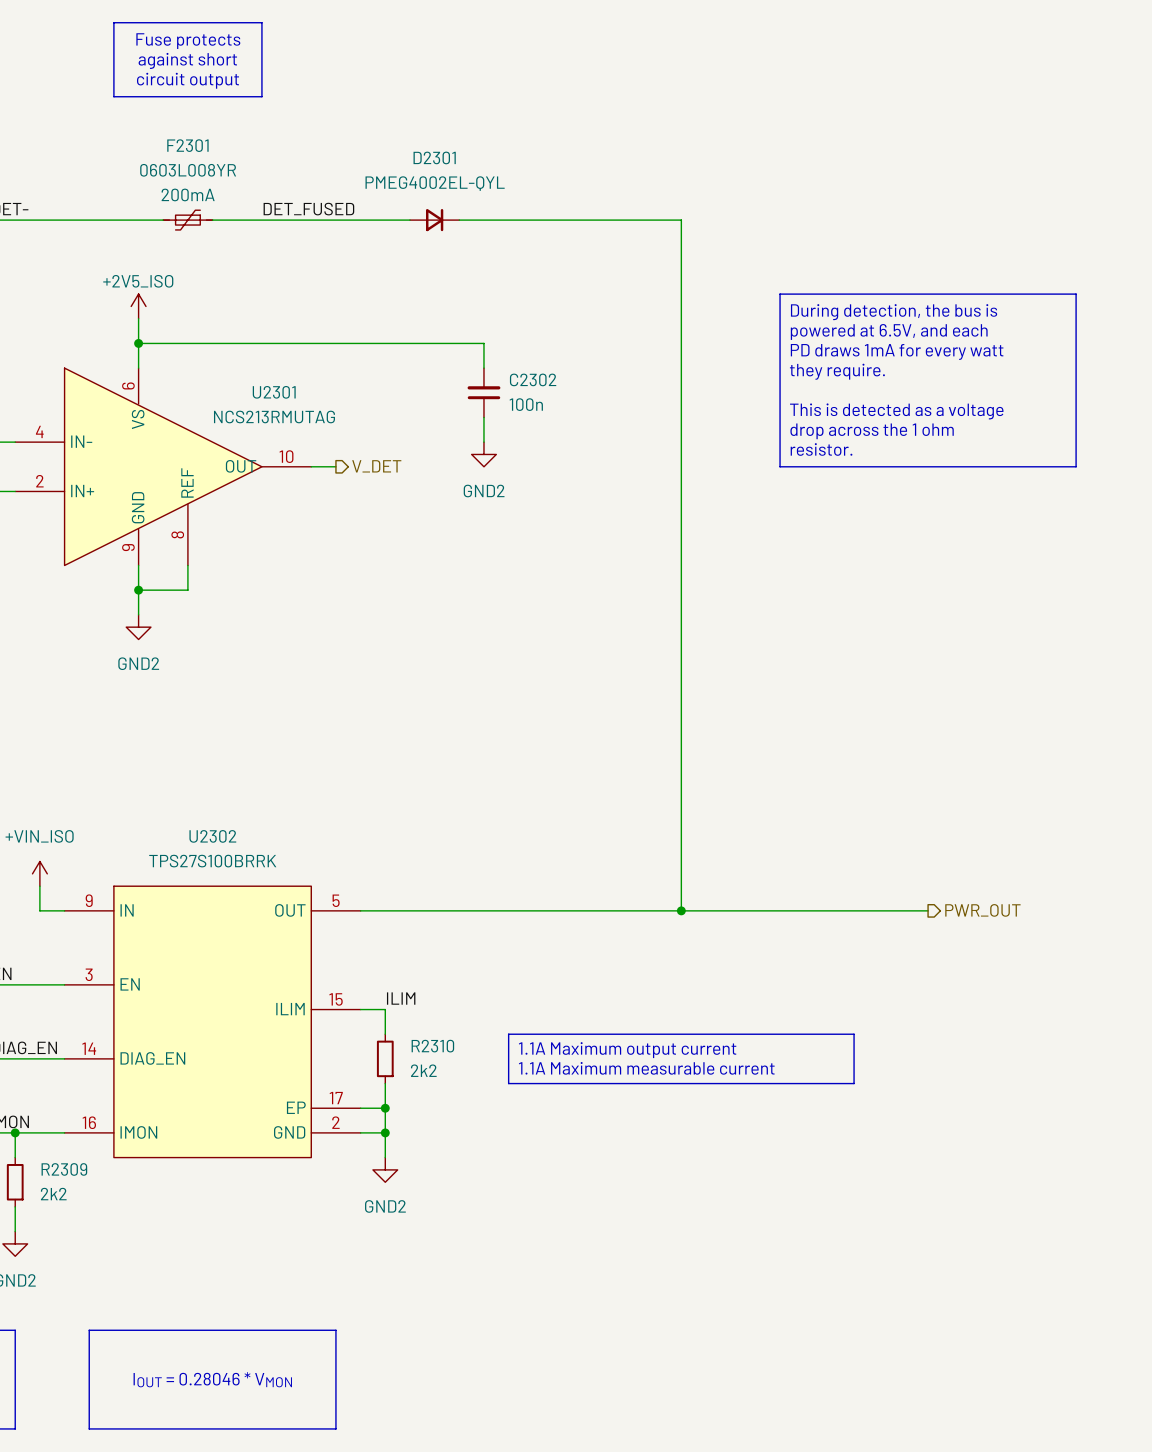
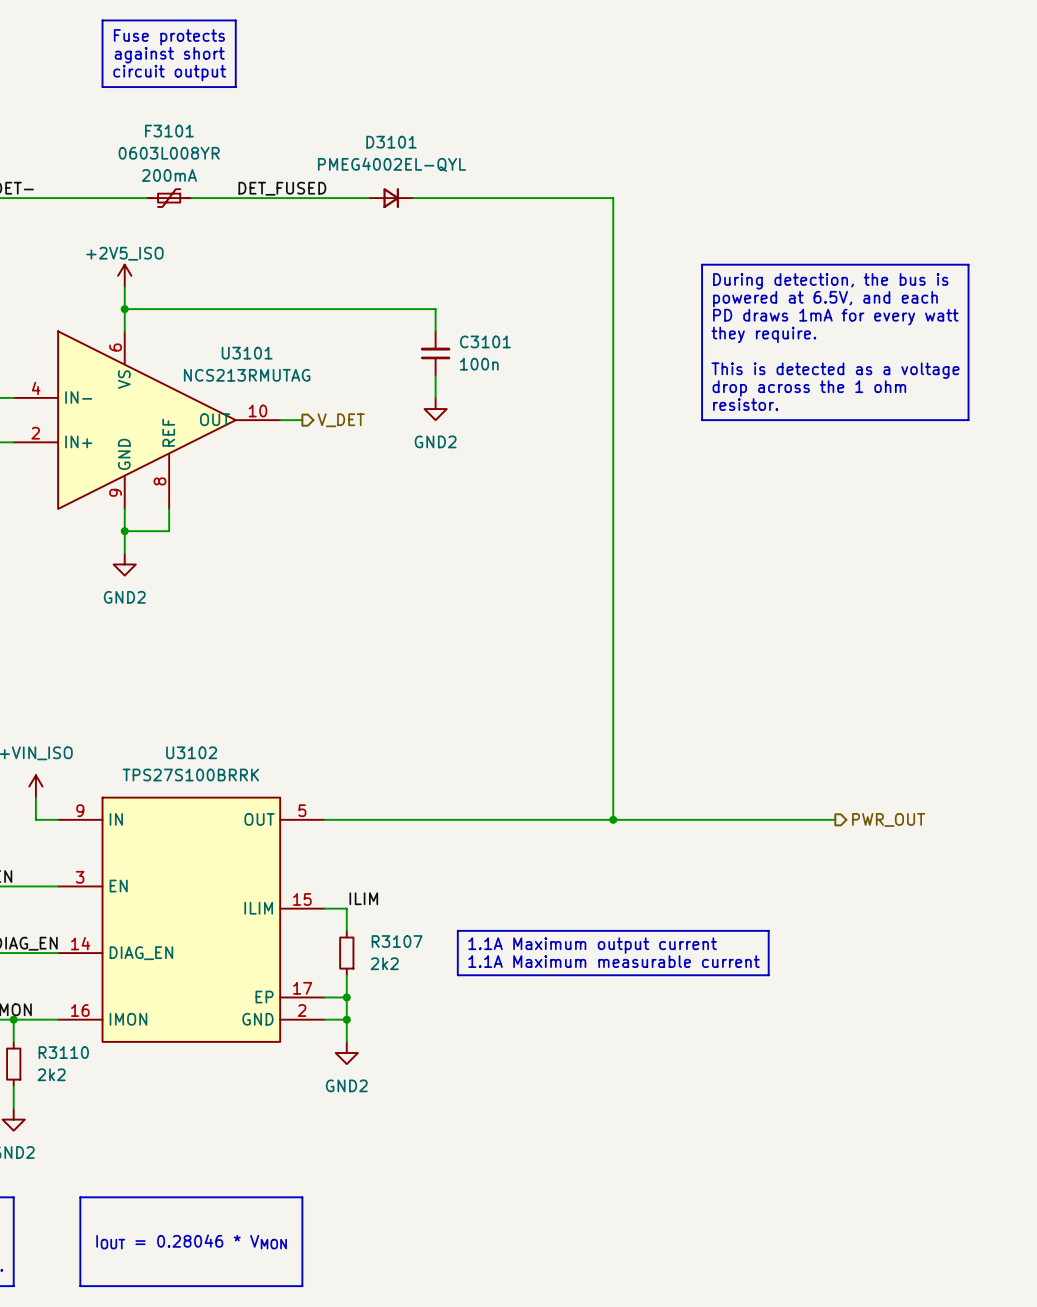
F2301 name: F2301 (187, 145) -> F3101 (169, 131)
D2301 name: D2301 (434, 157) -> D3101 (391, 142)
C2302 name: C2302 (533, 379) -> C3101 (485, 341)
U2301 name: U2301 (274, 392) -> U3101 (247, 353)
U2302 name: U2302 (212, 836) -> U3102 (191, 752)
R2310 name: R2310 (432, 1046) -> R3107 (397, 941)
R2309 name: R2309 (64, 1169) -> R3110 (63, 1052)

